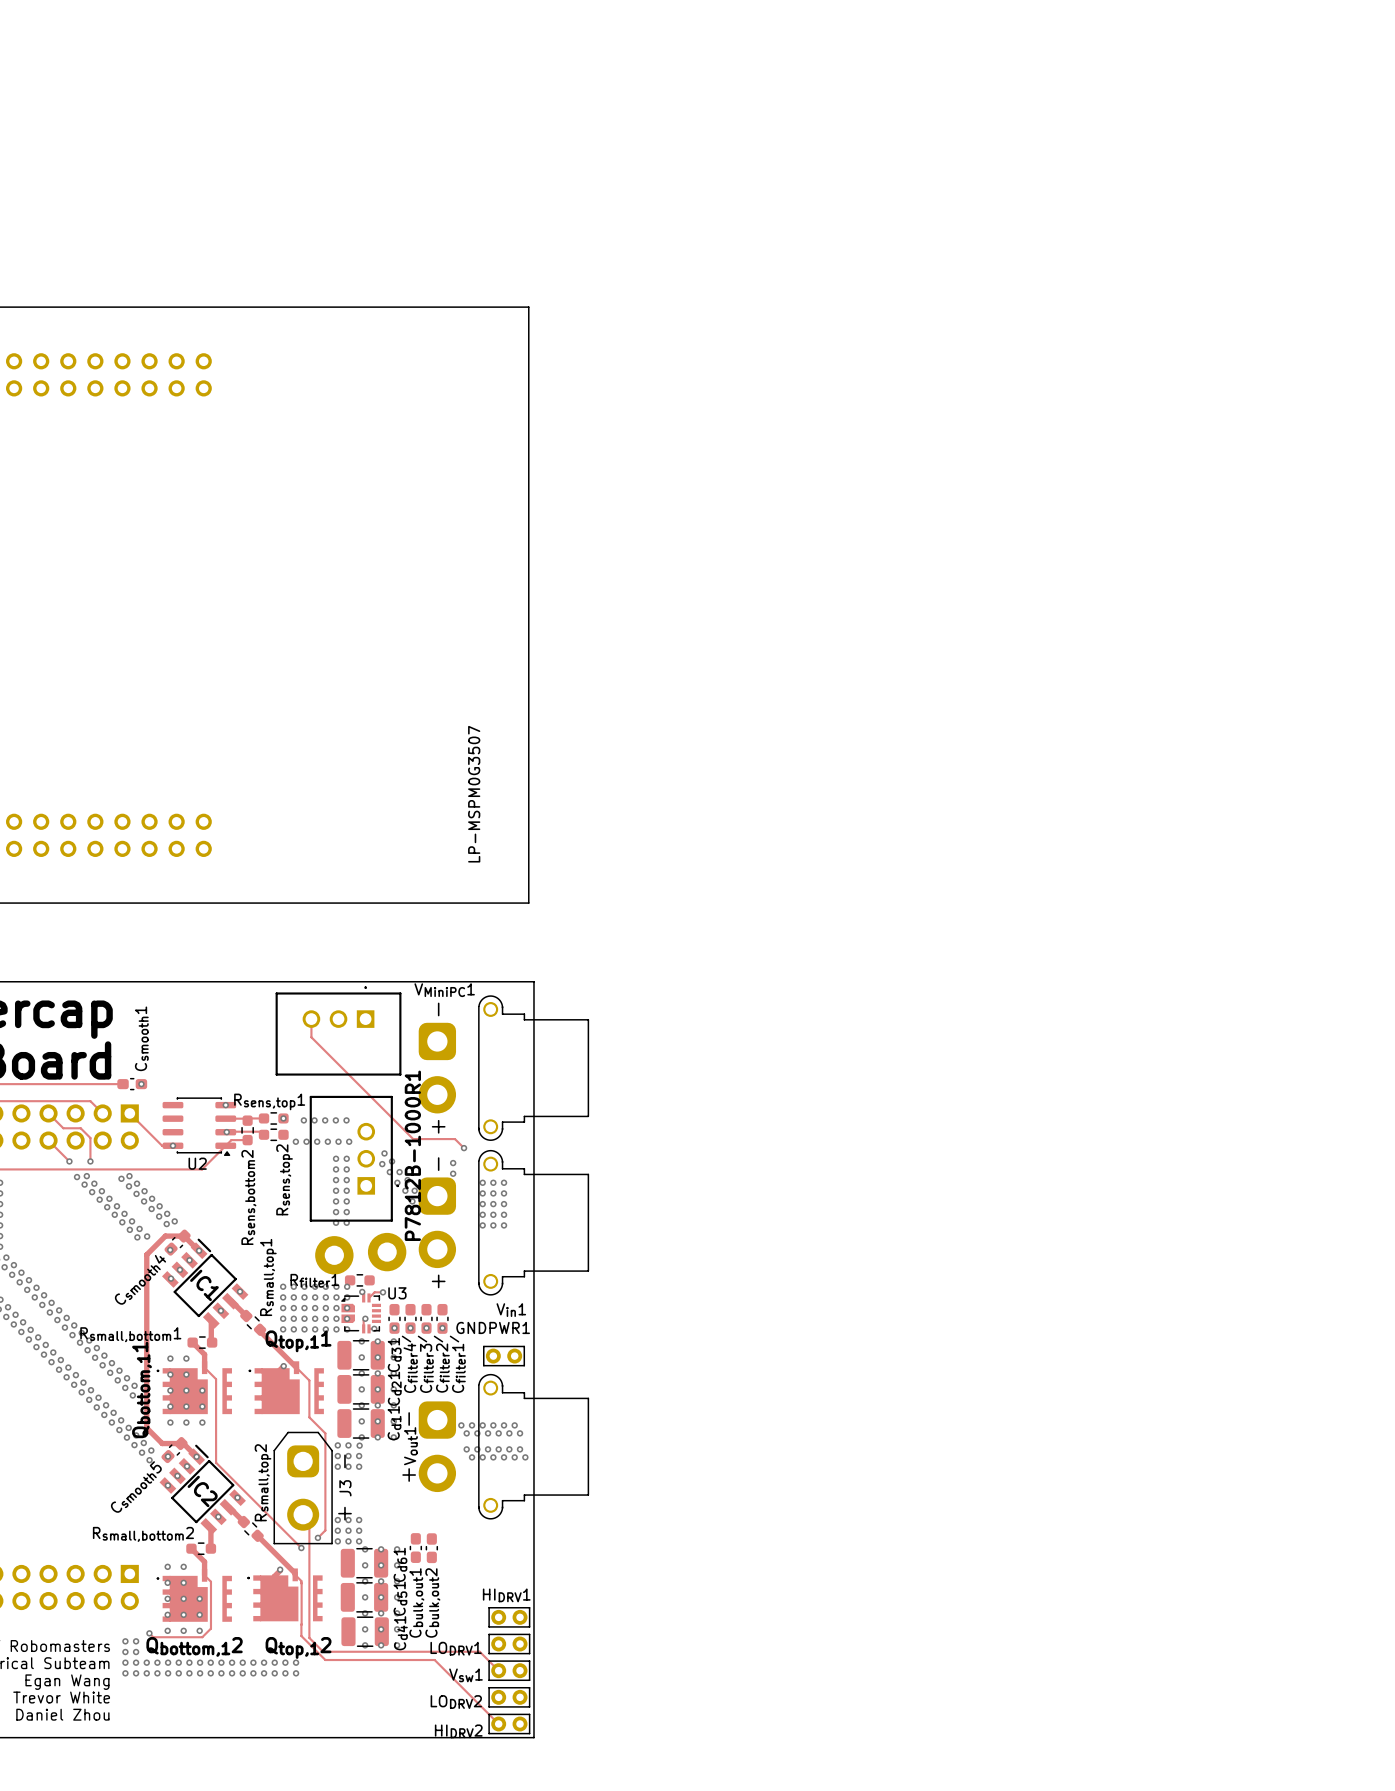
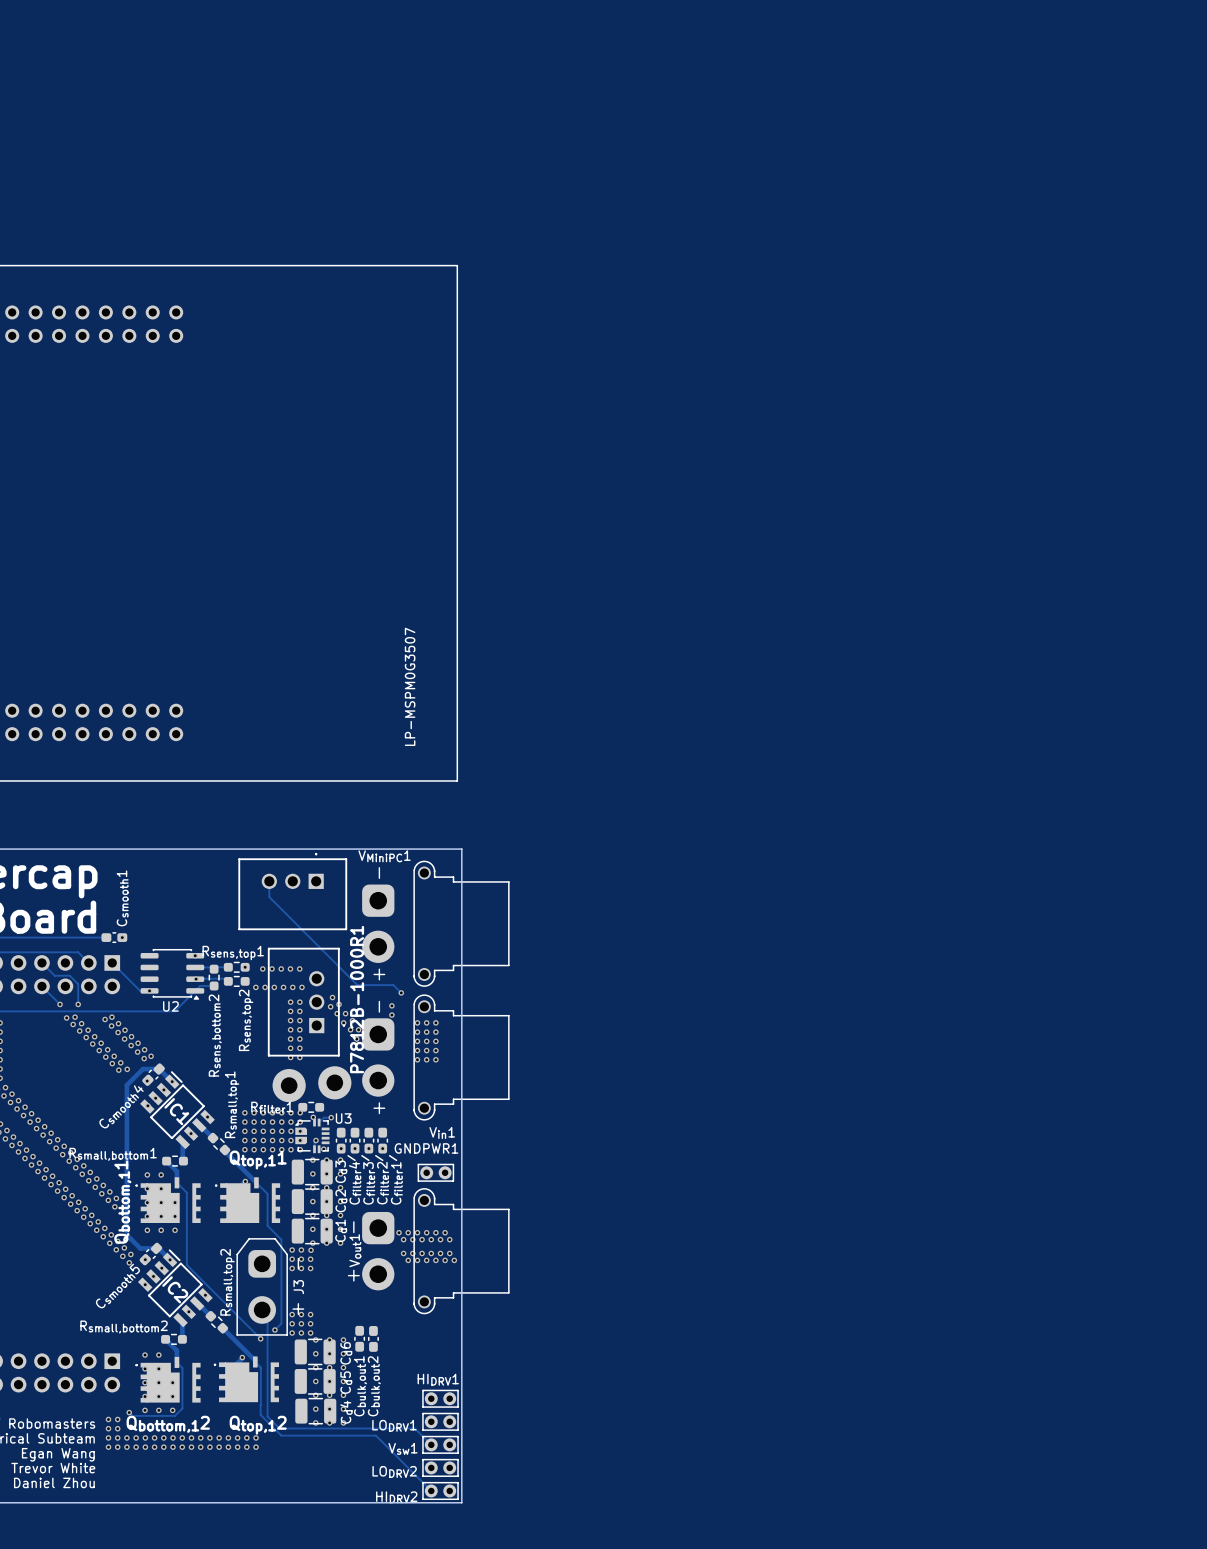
Cd31 name: Cd31 (394, 1354) -> Cd3 (341, 1171)
Cd21 name: Cd21 (394, 1388) -> Cd2 (341, 1201)
Cd11 name: Cd11 (394, 1423) -> Cd1 (341, 1230)
Cd61 name: Cd61 (400, 1564) -> Cd6 (346, 1353)
Cd51 name: Cd51 (400, 1598) -> Cd5 (346, 1382)
Cd41 name: Cd41 (400, 1633) -> Cd4 (346, 1412)

